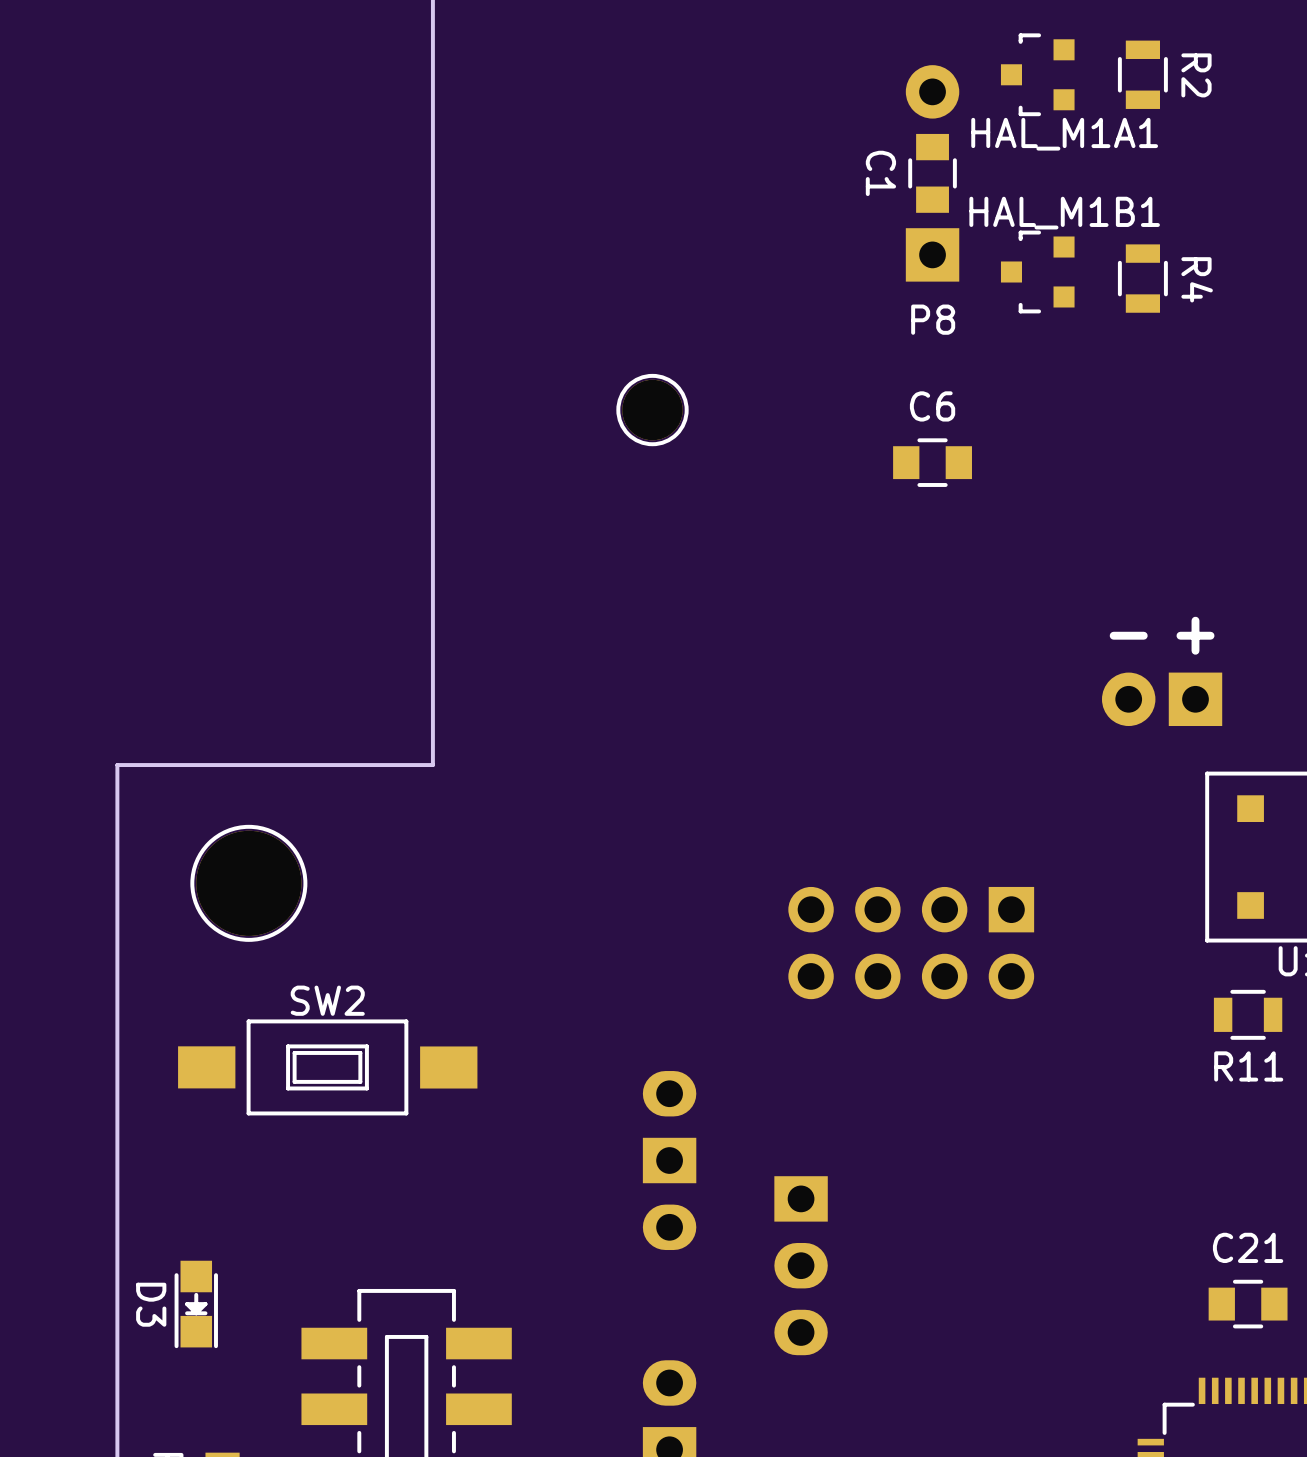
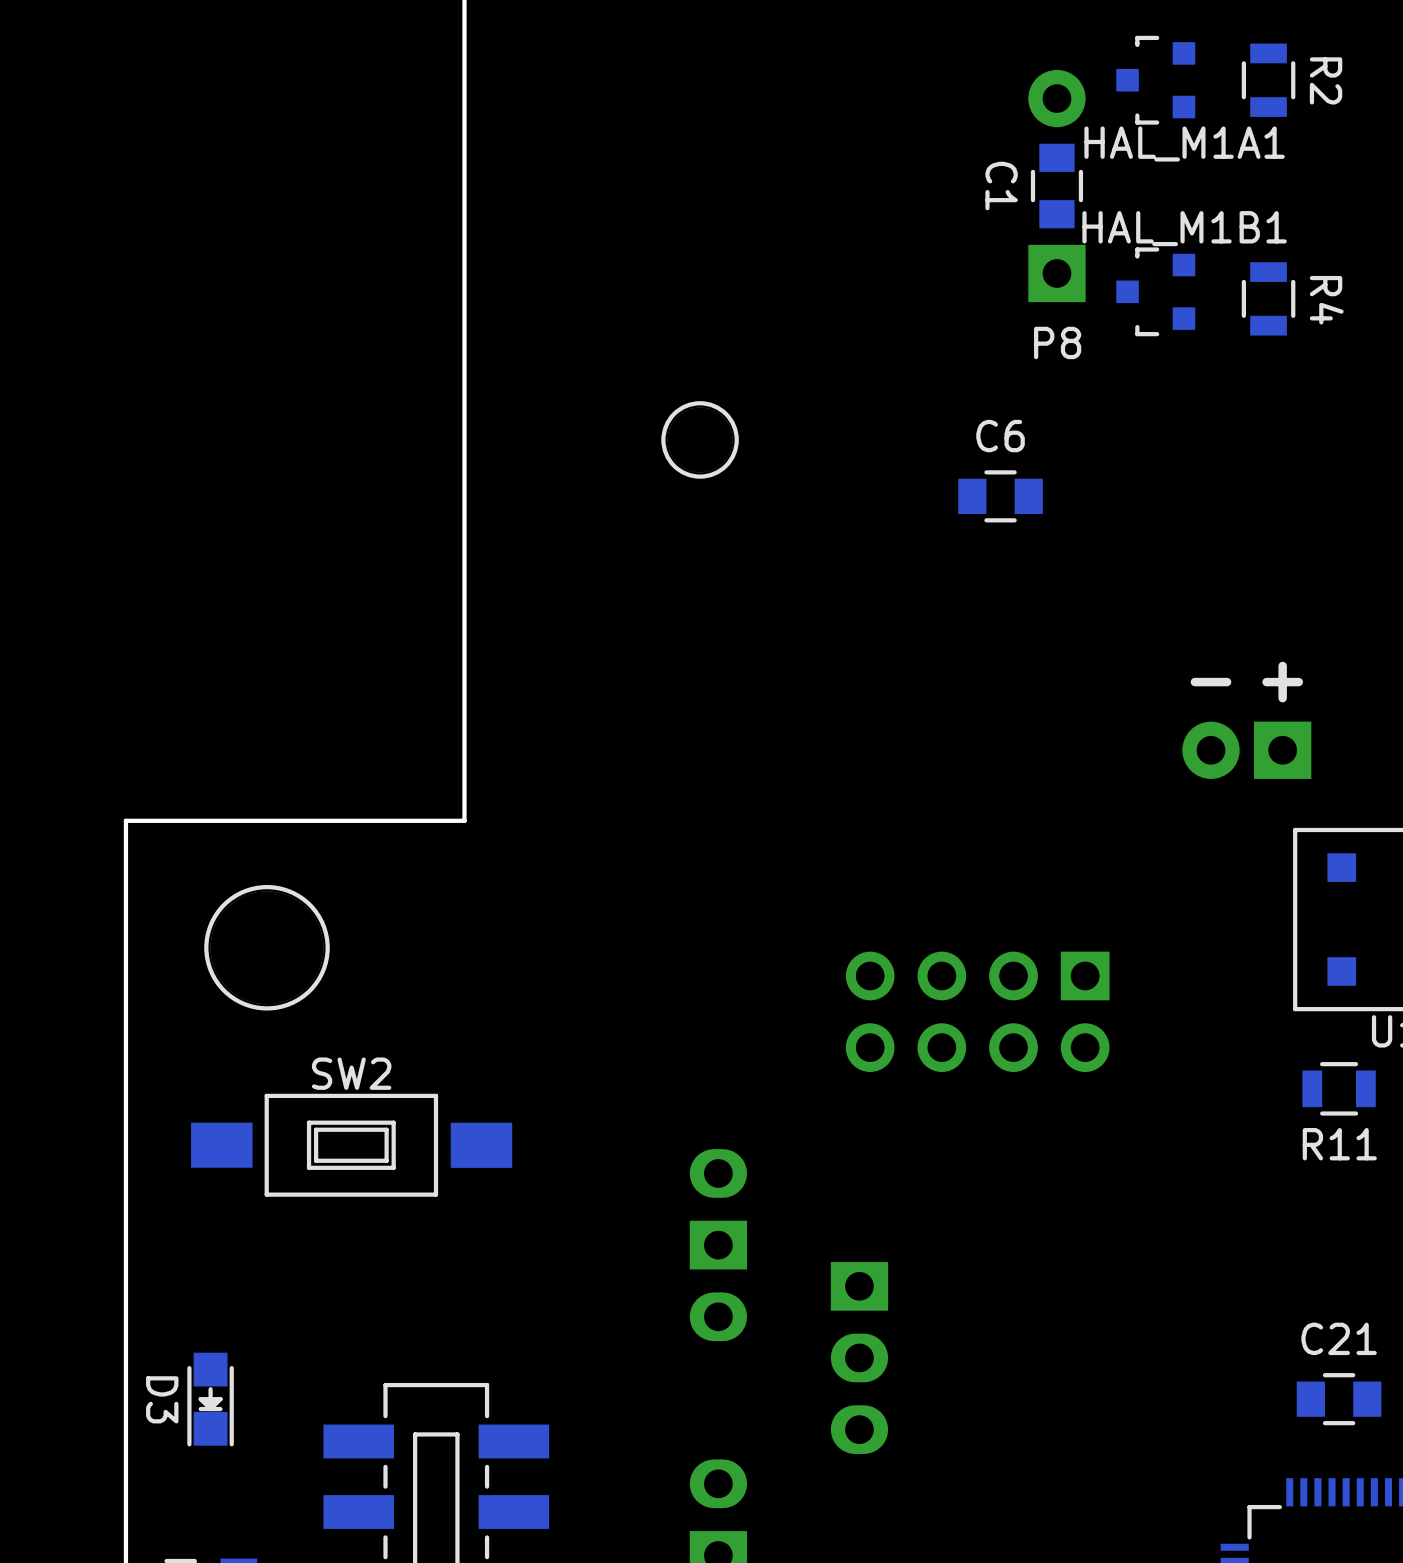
HAL_M1A1 position: (1037, 74) -> (1155, 80)
R2 position: (1142, 74) -> (1268, 80)
P8 position: (932, 173) -> (1056, 186)
C1 position: (932, 173) -> (1056, 186)
HAL_M1B1 position: (1037, 271) -> (1155, 291)
R4 position: (1142, 278) -> (1268, 298)

